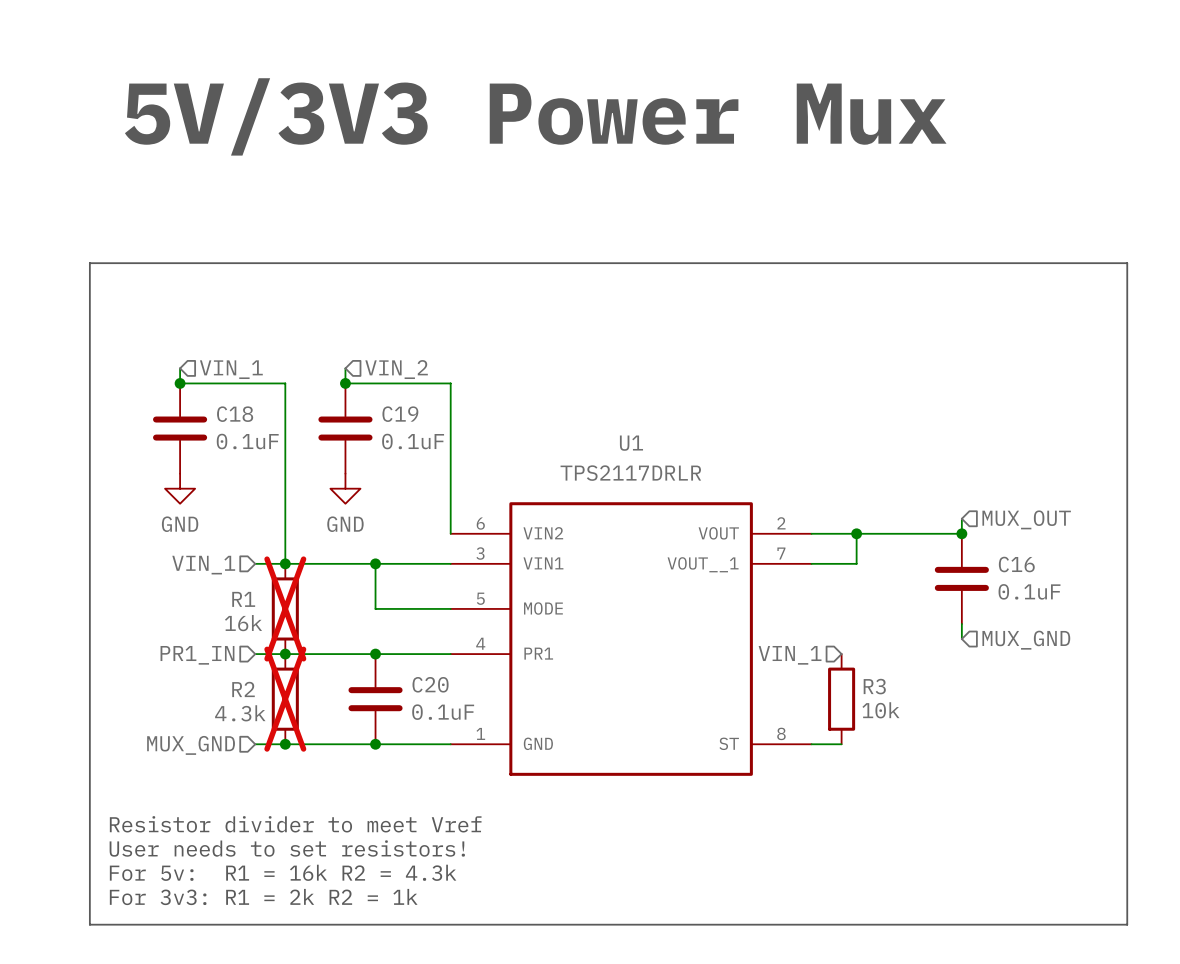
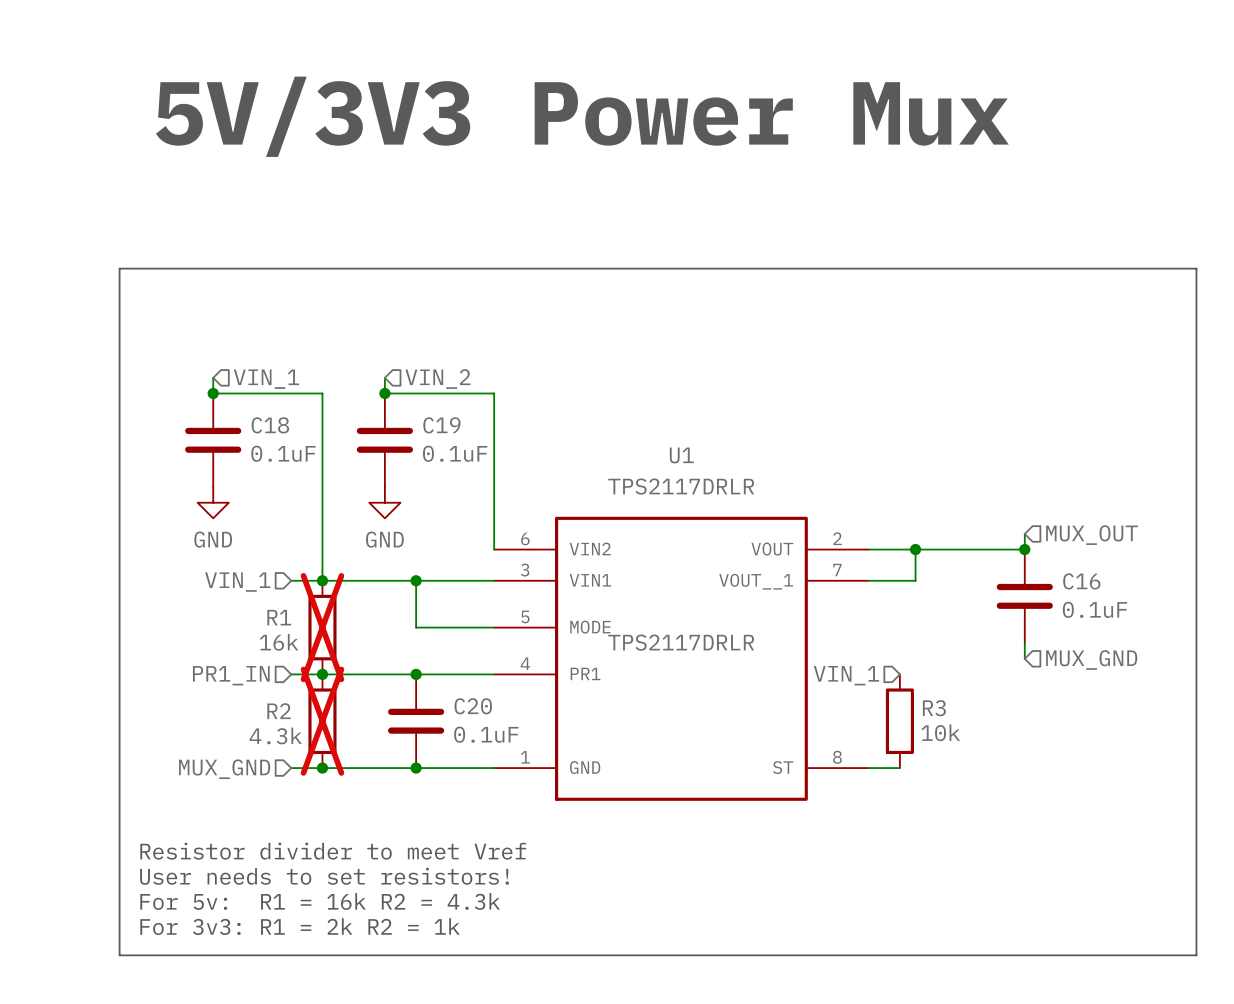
U1 text: none -> TPS2117DRLR (681, 642)

